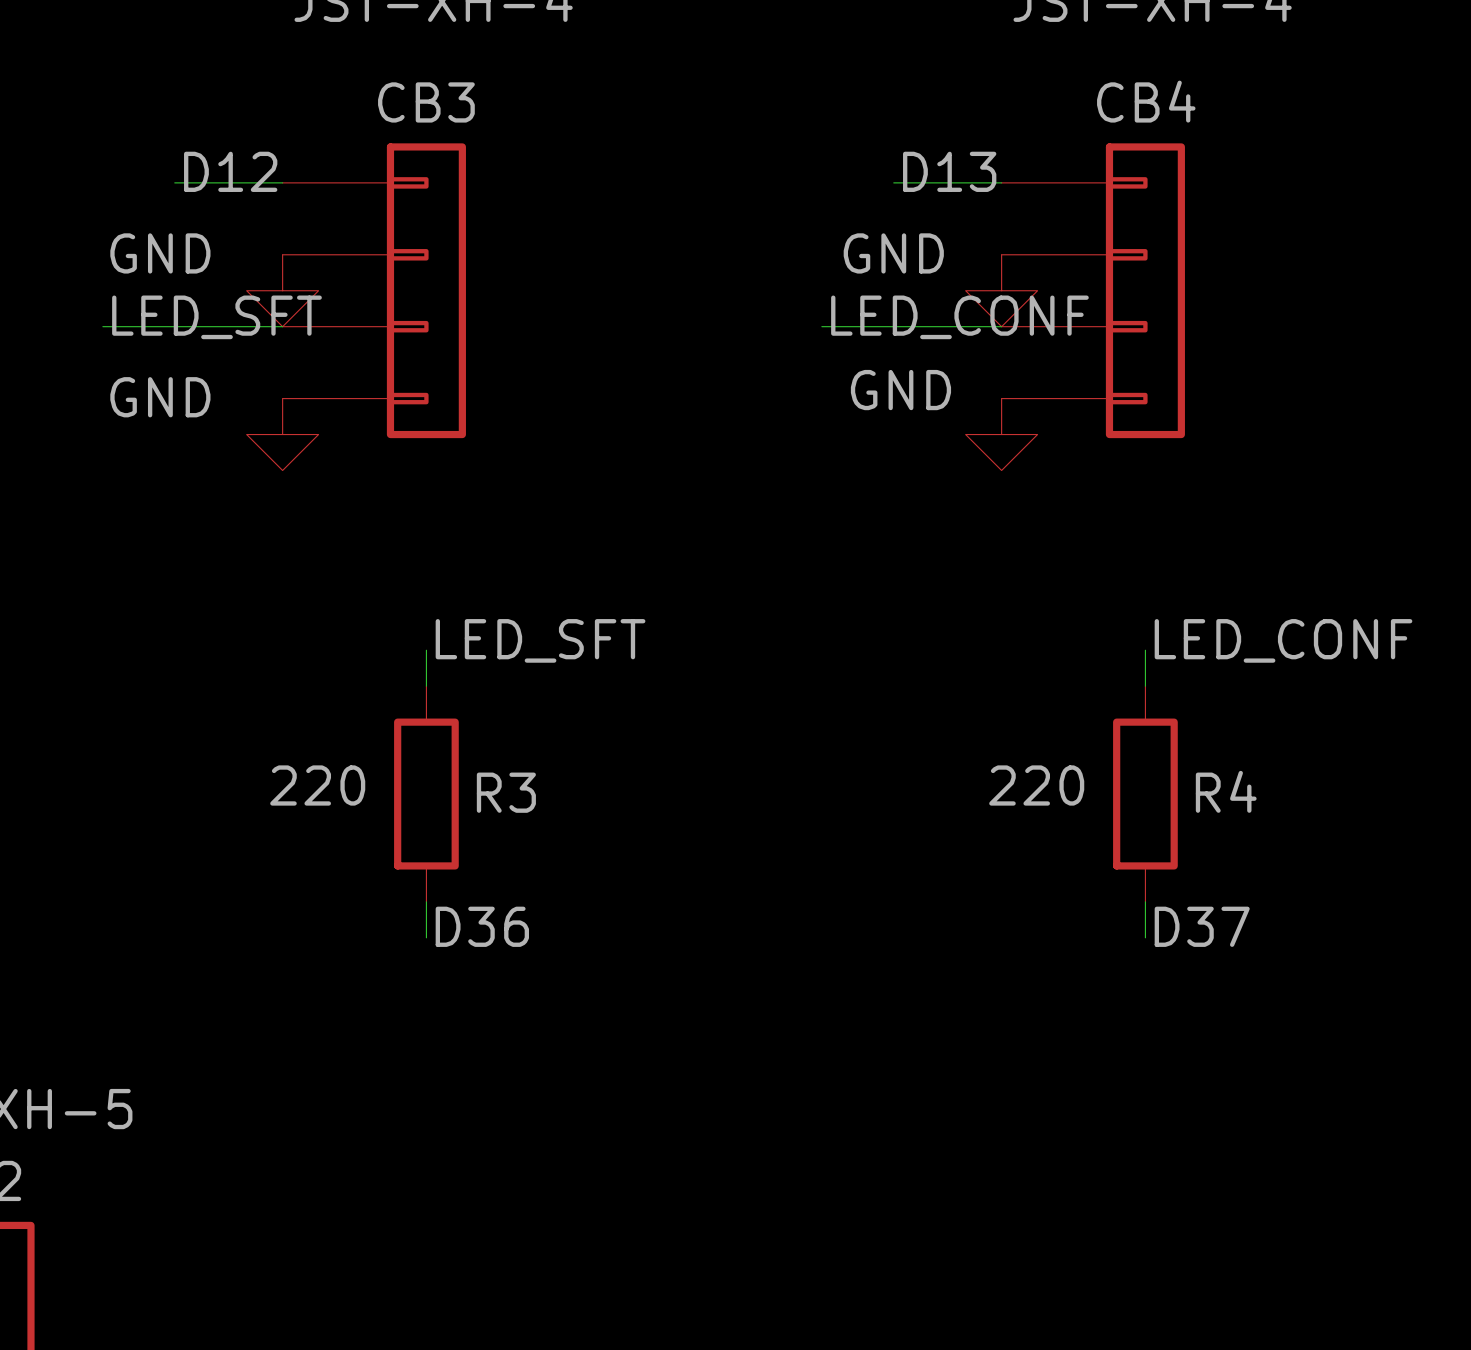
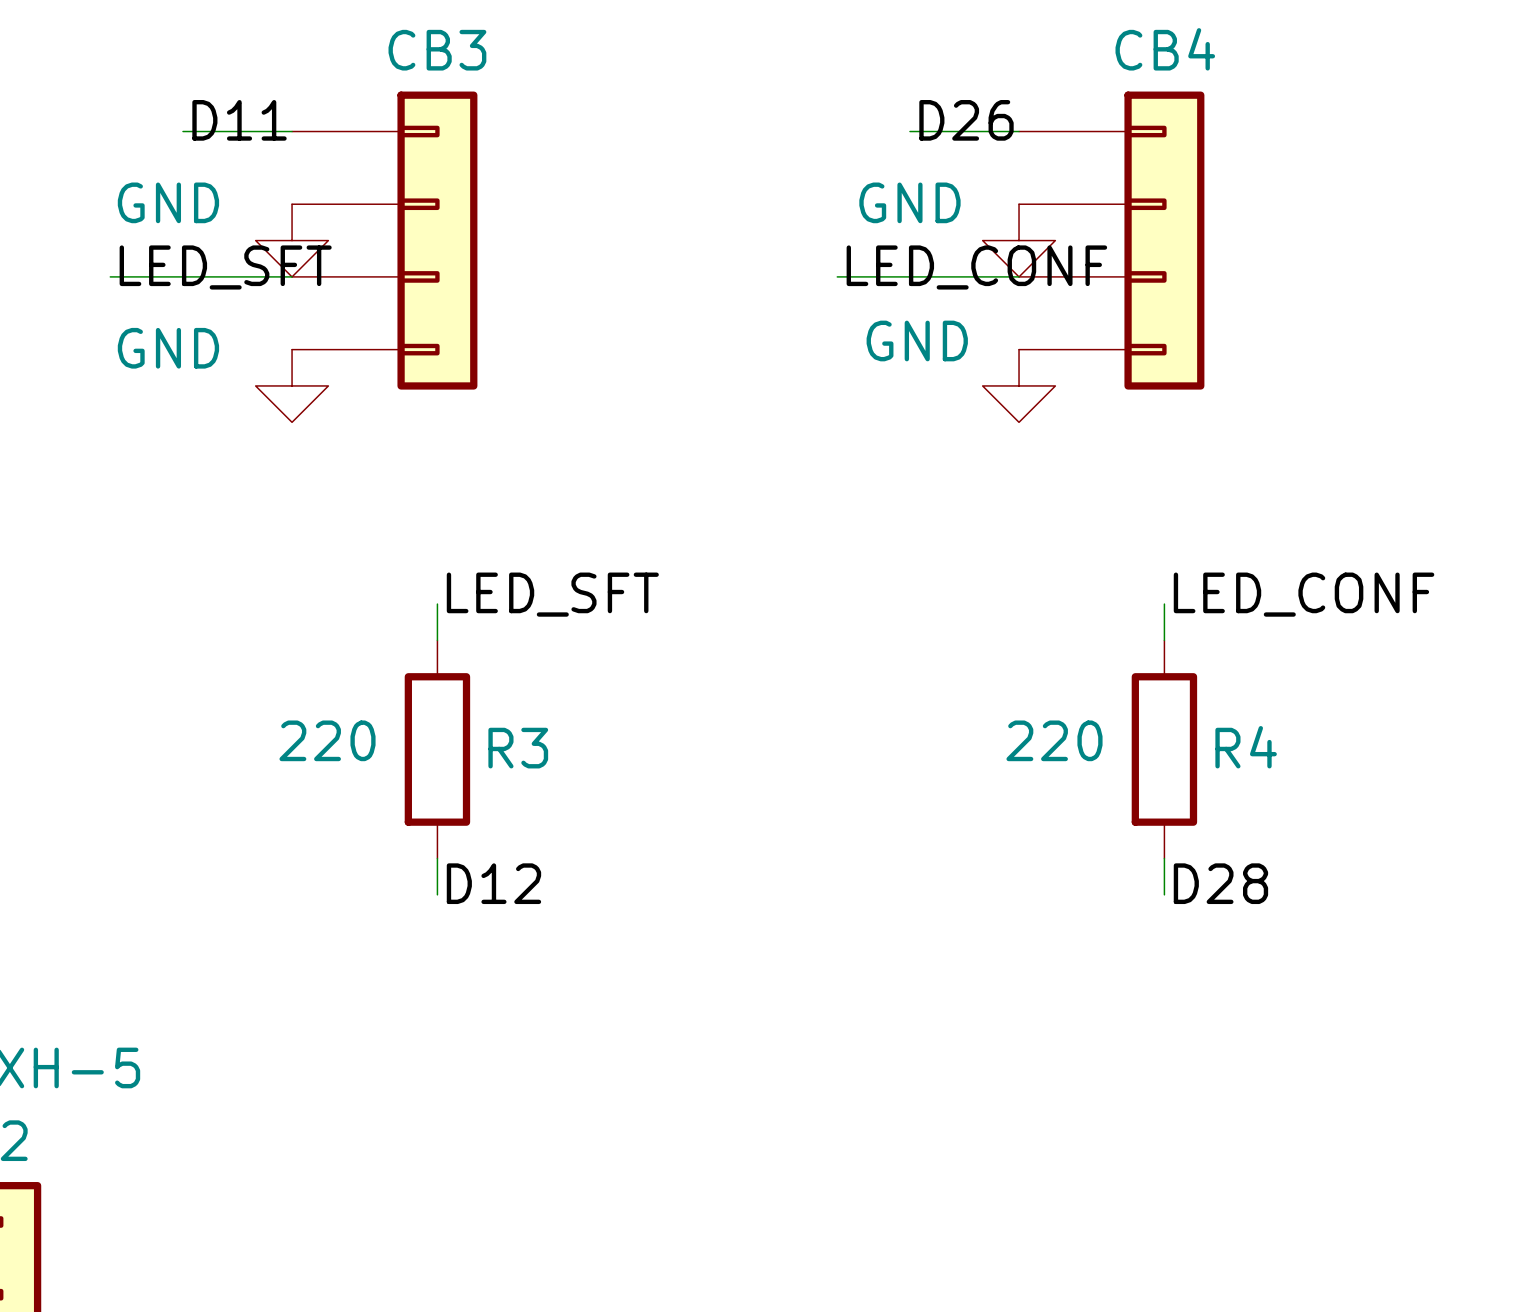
label: D12 (230, 171) -> D11 (239, 120)
label: D13 (949, 171) -> D26 (966, 120)
label: D36 (482, 926) -> D12 (493, 883)
label: D37 (1202, 926) -> D28 (1220, 883)

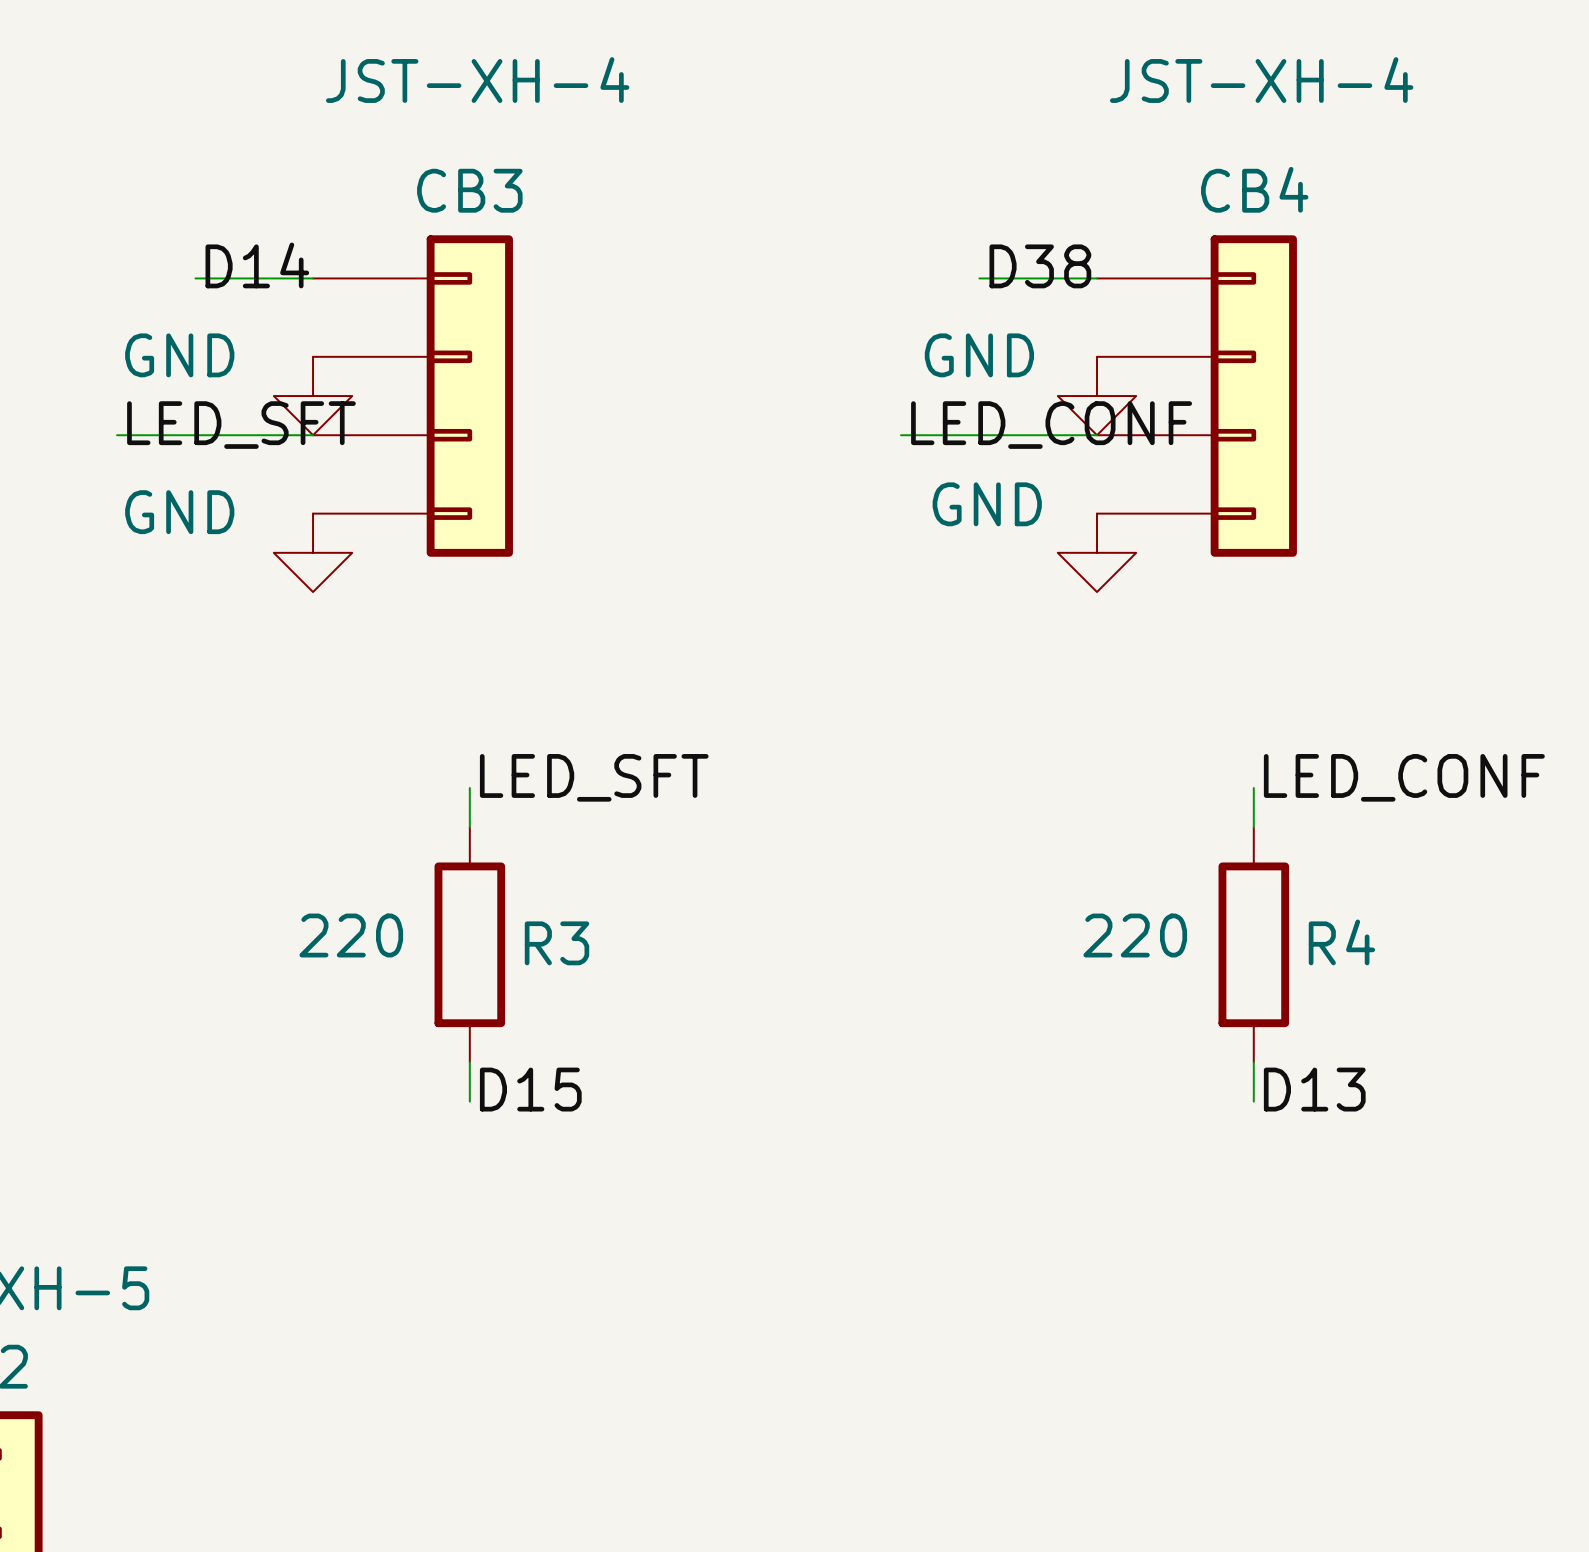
label: D11 (239, 120) -> D14 (257, 265)
label: D26 (966, 120) -> D38 (1040, 266)
label: D12 (493, 883) -> D15 (530, 1089)
label: D28 (1220, 883) -> D13 (1314, 1089)

